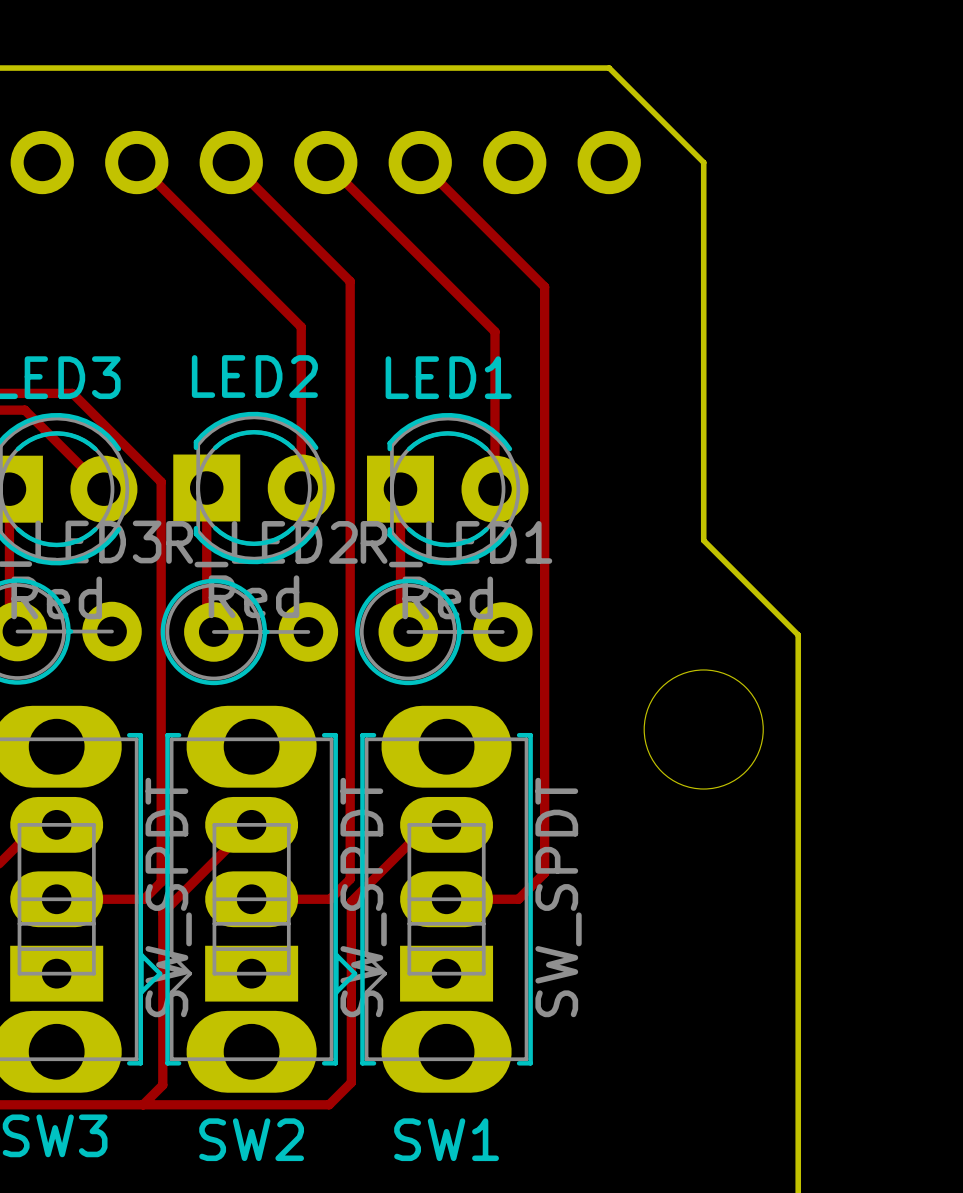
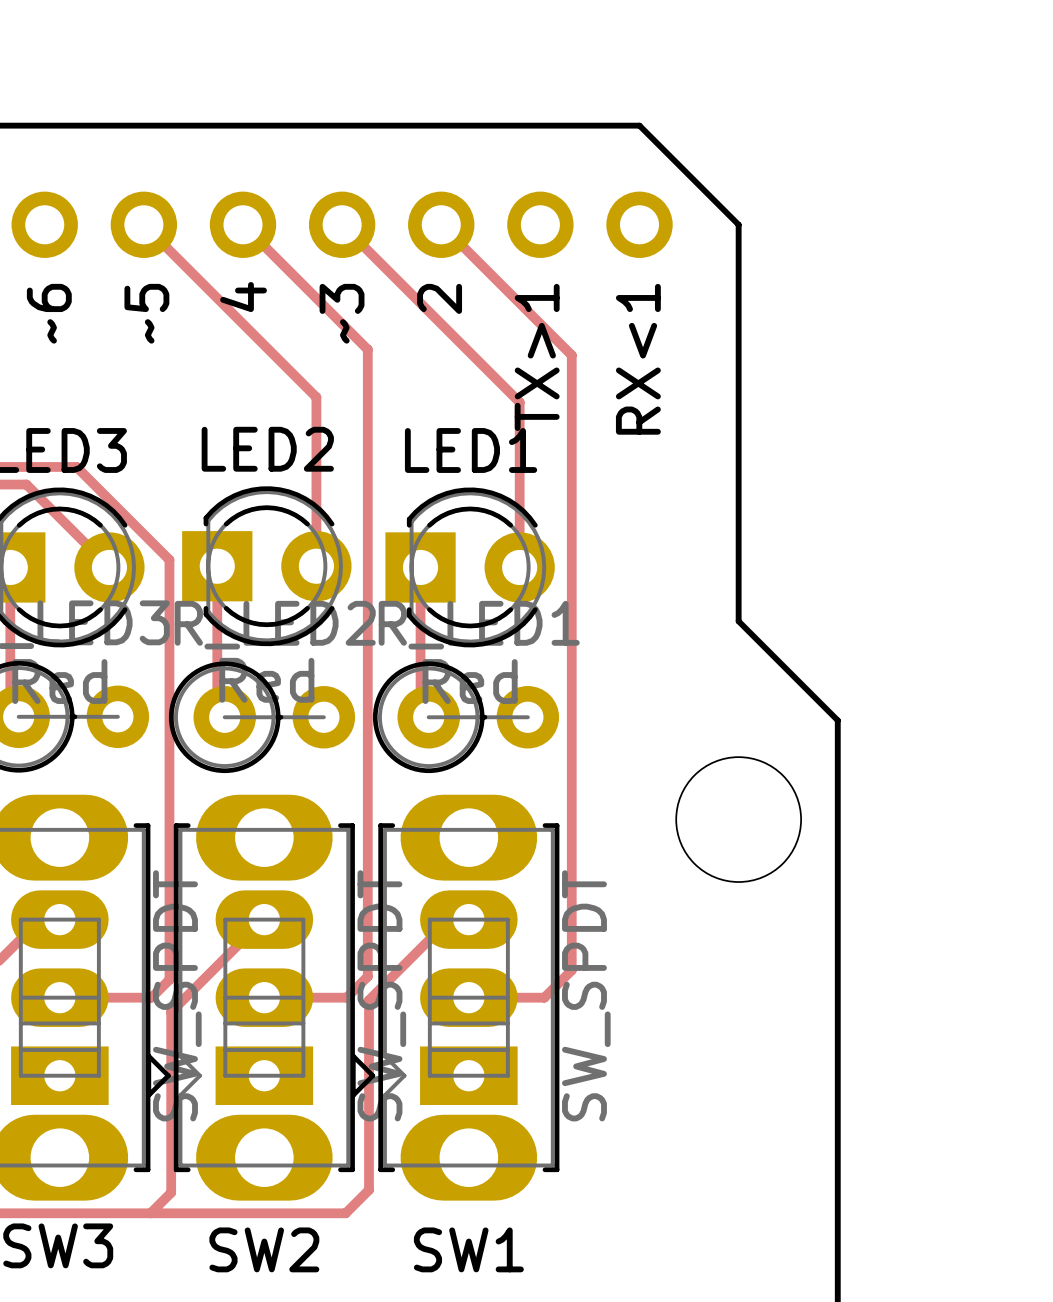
text: none -> 4 (243, 297)
text: none -> 2 (439, 298)
text: none -> ~6 (49, 313)
text: none -> ~5 (146, 313)
text: none -> ~3 (342, 313)
text: none -> TX>1 (537, 357)
text: none -> RX<1 (638, 359)

